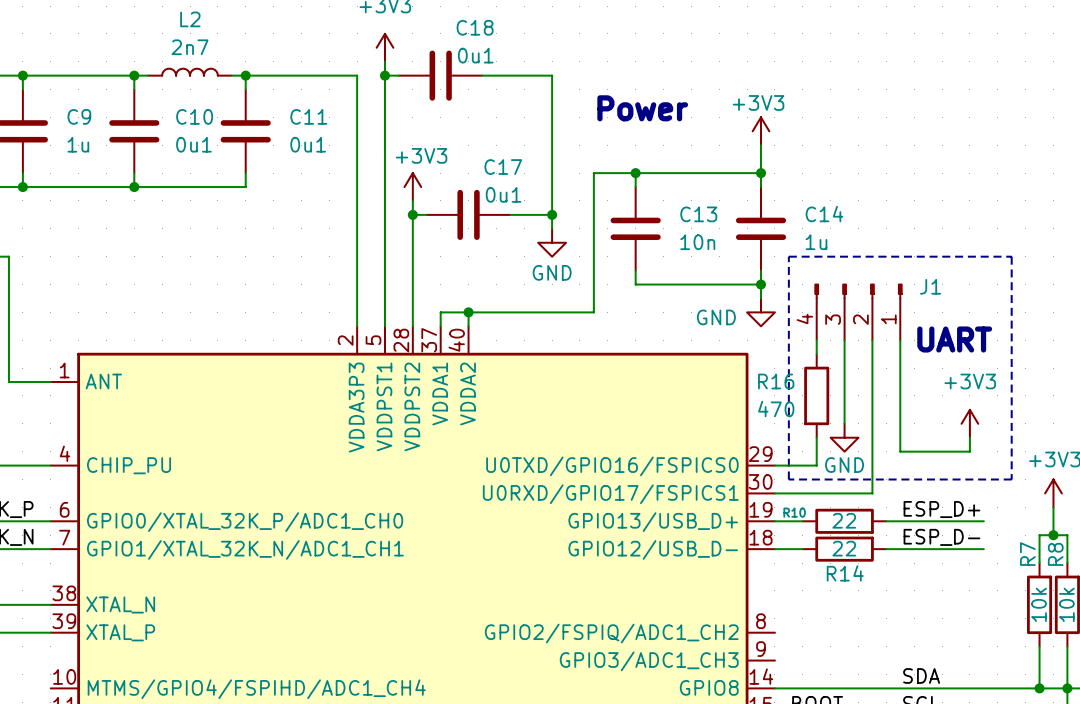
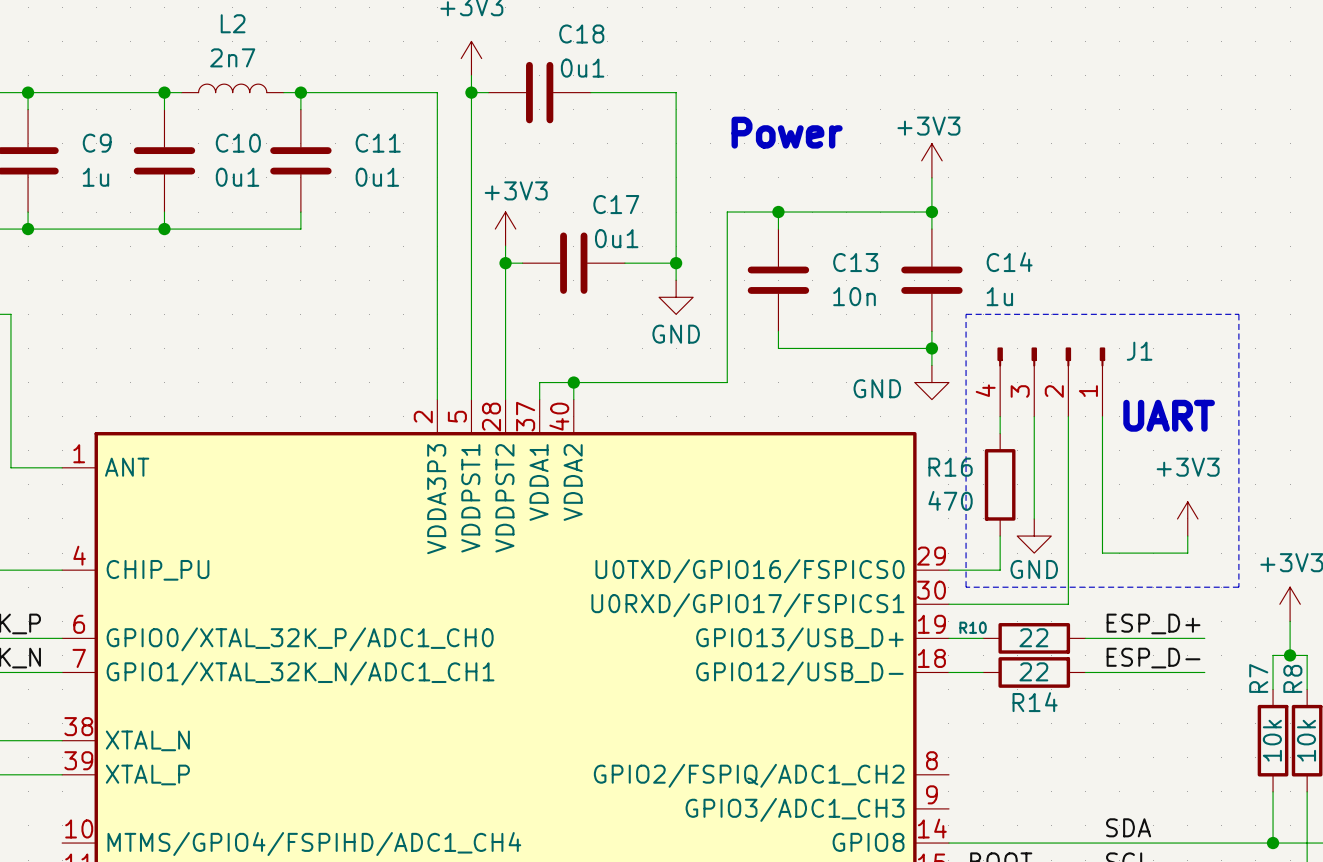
junction: (1067, 688) -> none

